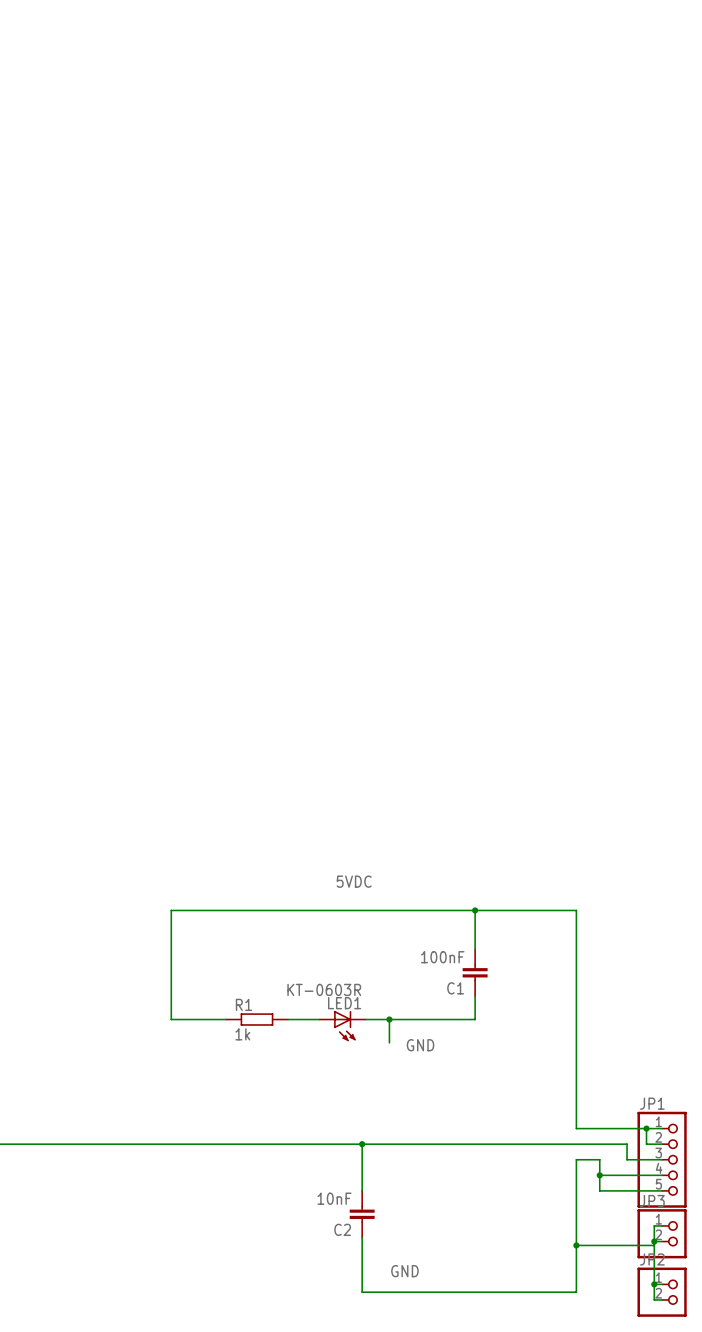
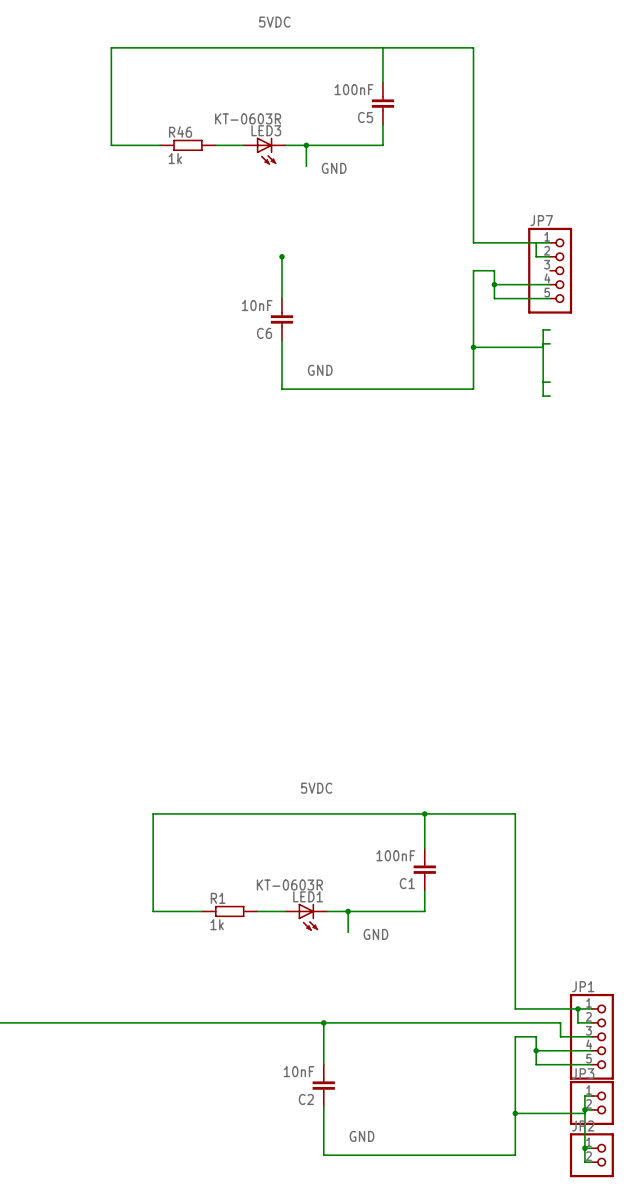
label: none -> 5VDC (274, 22)
wire: none -> (382, 47) (382, 82)
C5: none -> 100nF (382, 103)
wire: none -> (382, 124) (382, 145) (285, 145)
wire: none -> (160, 145) (111, 145) (111, 47) (473, 47) (473, 242) (550, 242)
R46: none -> 1k (187, 145)
wire: none -> (215, 145) (243, 145)
wire: none -> (306, 145) (306, 166)
junction: none -> (306, 145)
LED3: none -> KT-0603R (264, 151)
label: none -> GND (334, 168)
wire: none -> (536, 242) (536, 256) (550, 256)
wire: none -> (281, 256) (281, 298)
junction: none -> (281, 256)
JP7: none -> (550, 270)
wire: none -> (494, 284) (550, 284)
junction: none -> (494, 284)
wire: none -> (550, 298) (494, 298) (494, 270) (473, 270) (473, 389) (281, 389) (281, 340)
C6: none -> 10nF (281, 319)
wire: none -> (550, 329) (543, 329) (543, 396) (550, 396)
wire: none -> (543, 343) (550, 343)
wire: none -> (473, 347) (543, 347)
junction: none -> (473, 347)
label: none -> GND (320, 370)
wire: none -> (543, 382) (550, 382)

